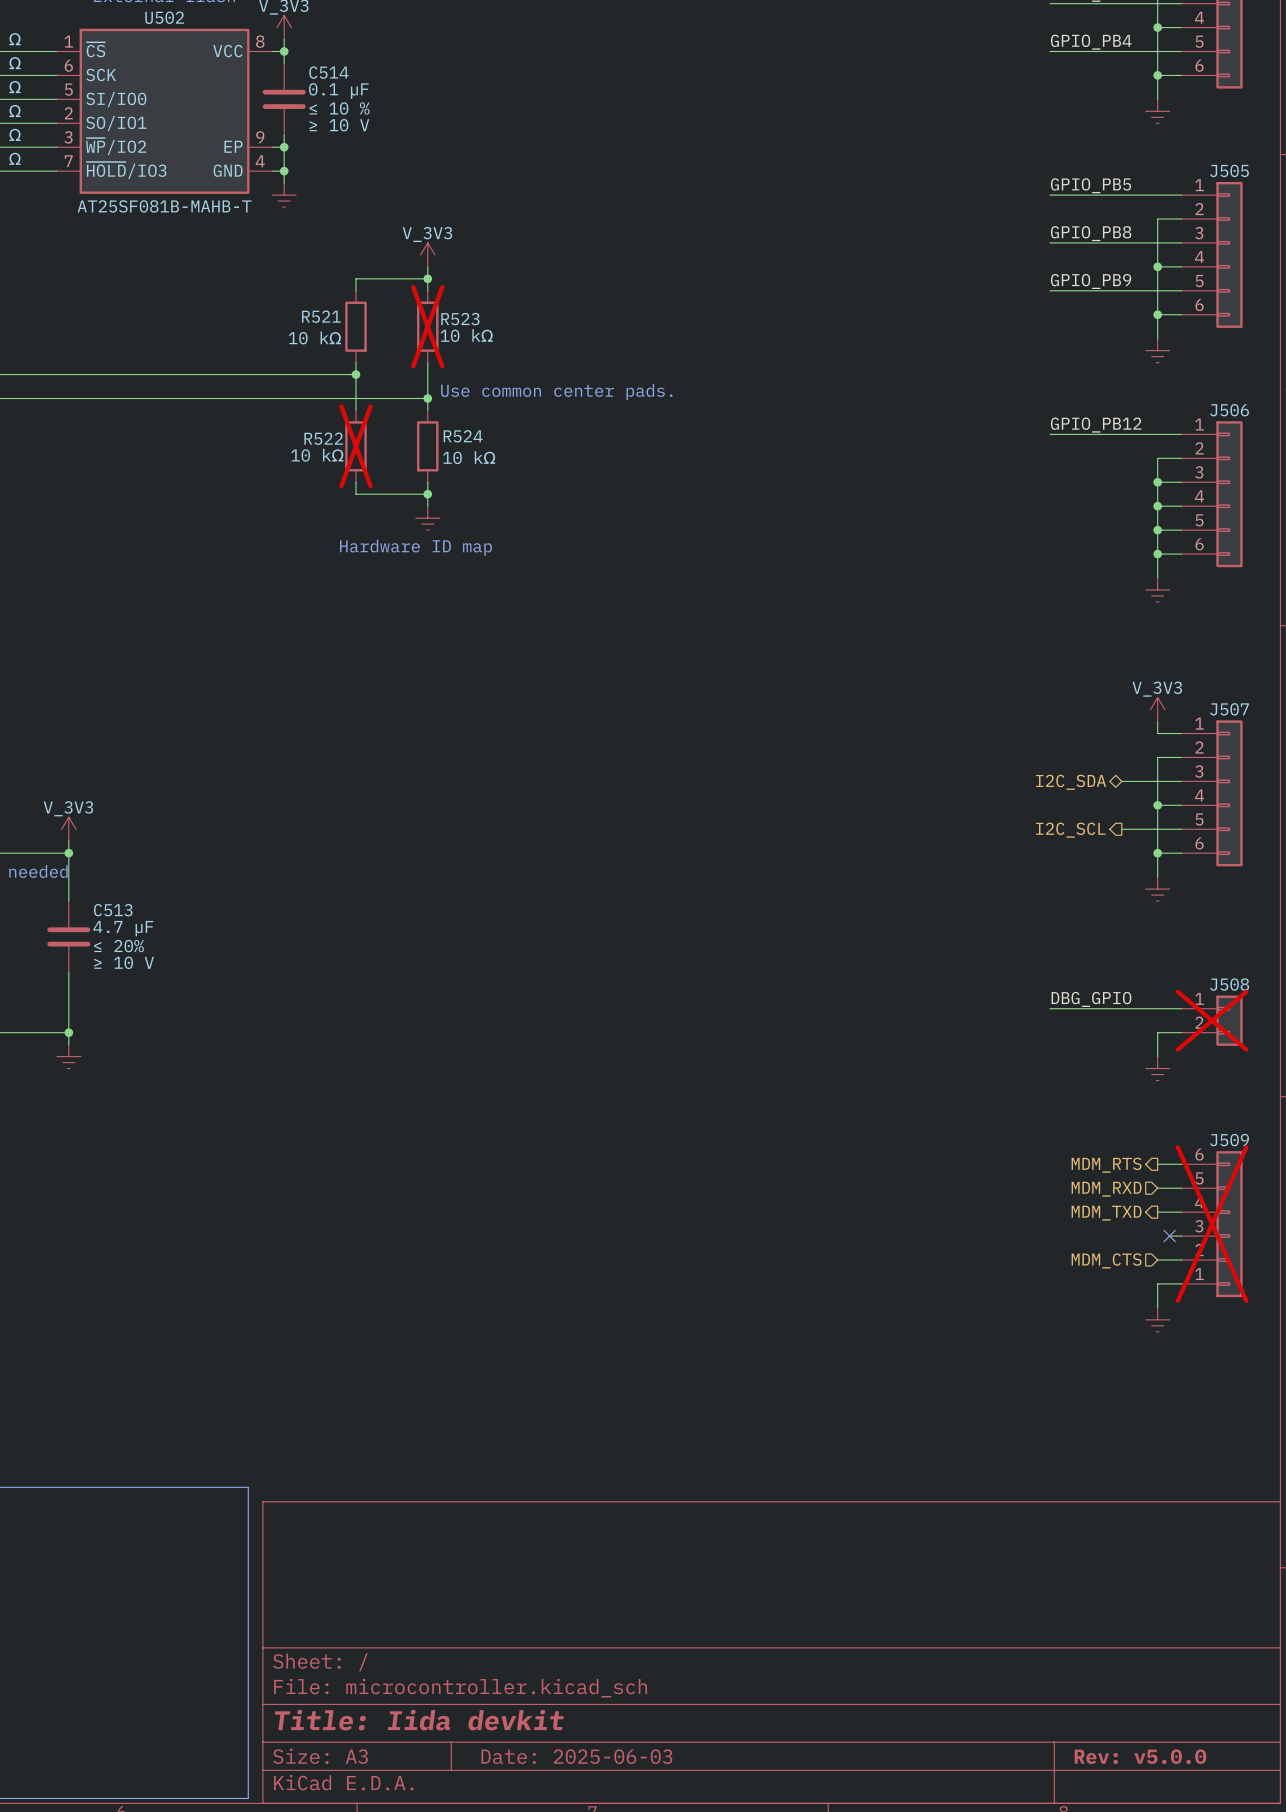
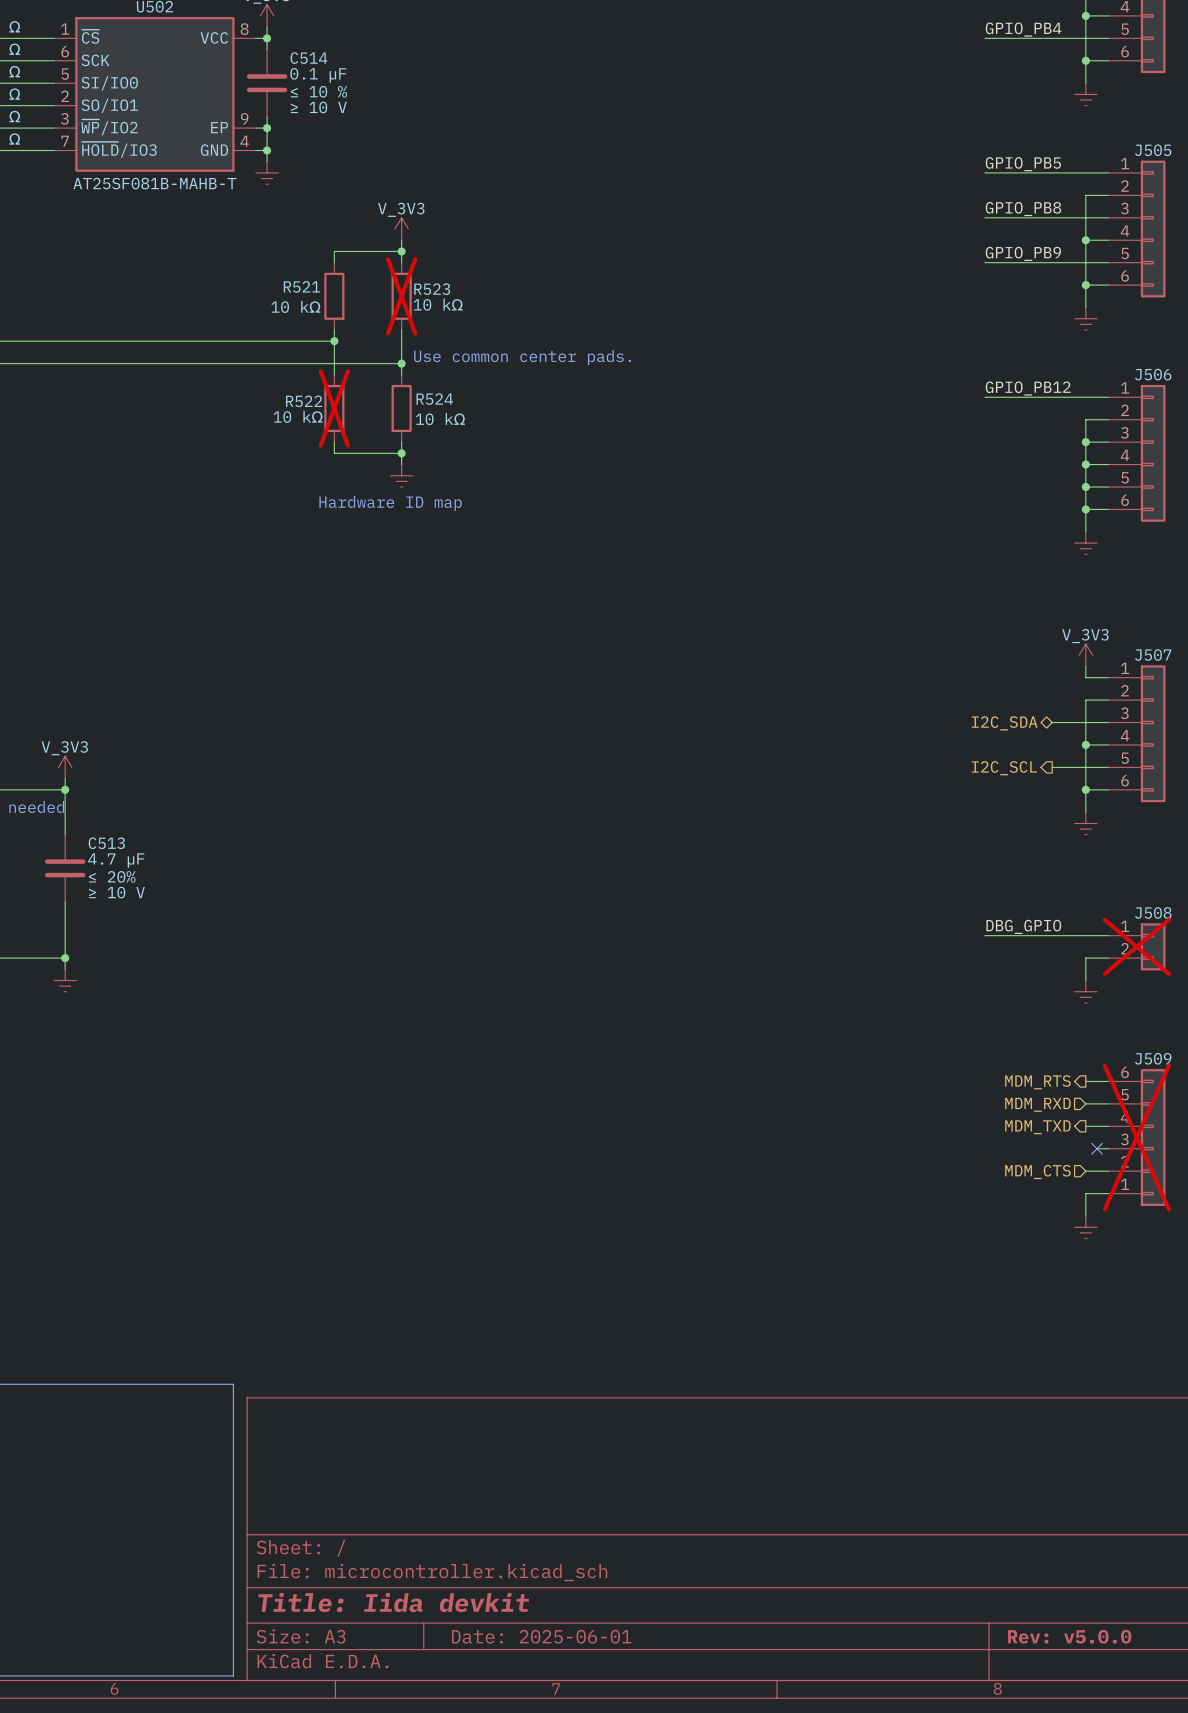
title block: Date: 2025-06-03 (576, 1756) -> Date: 2025-06-01 (541, 1636)

